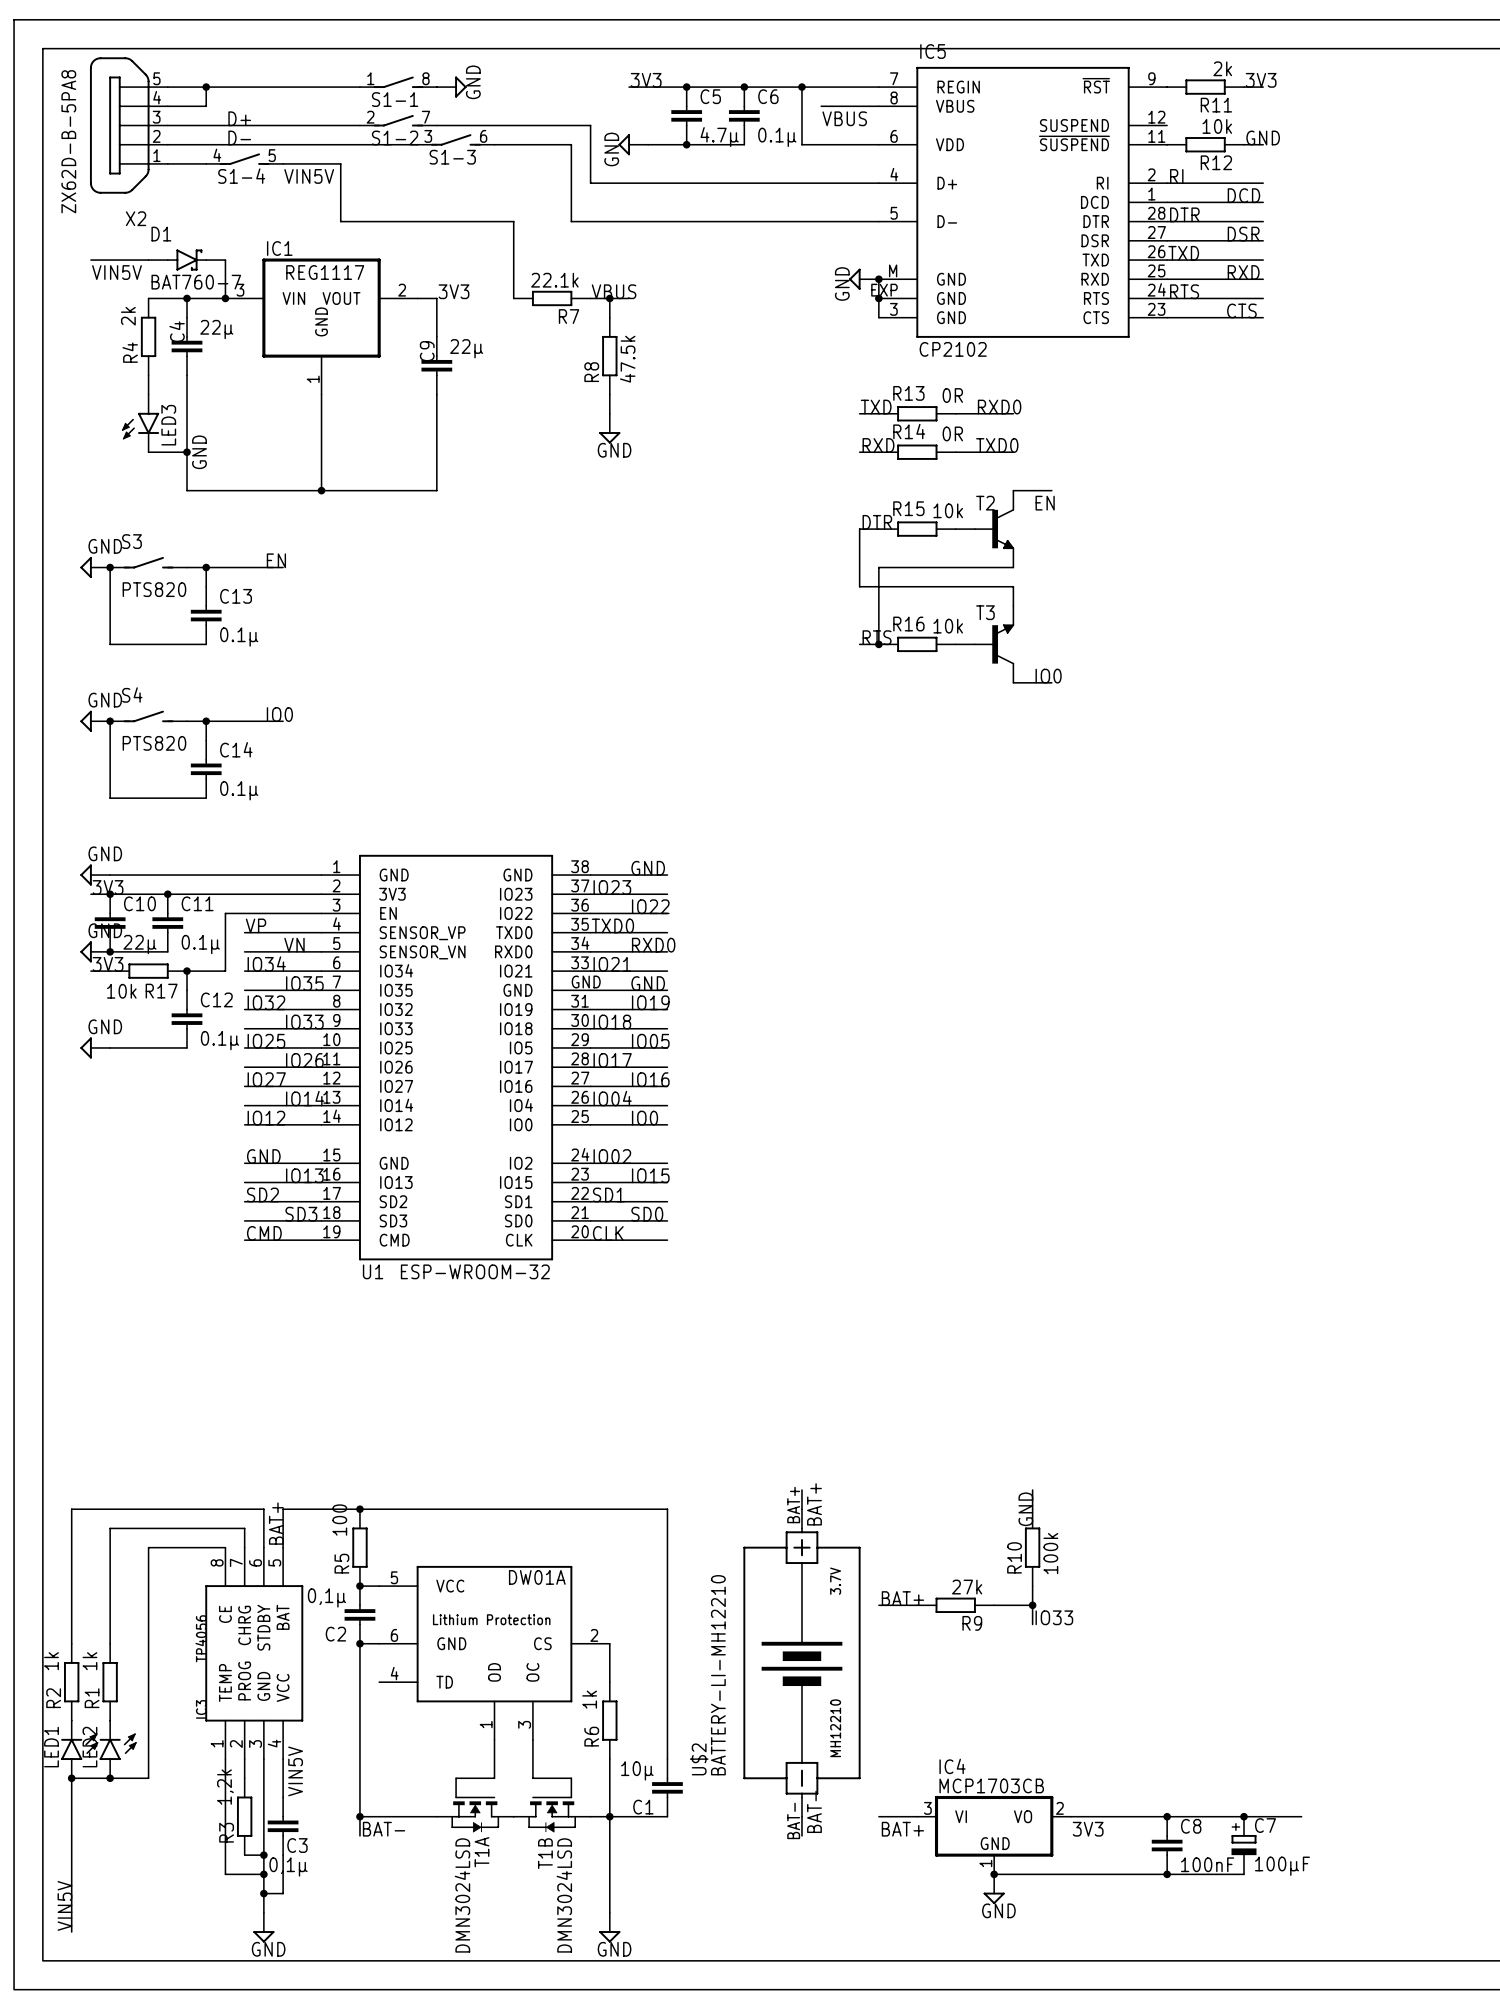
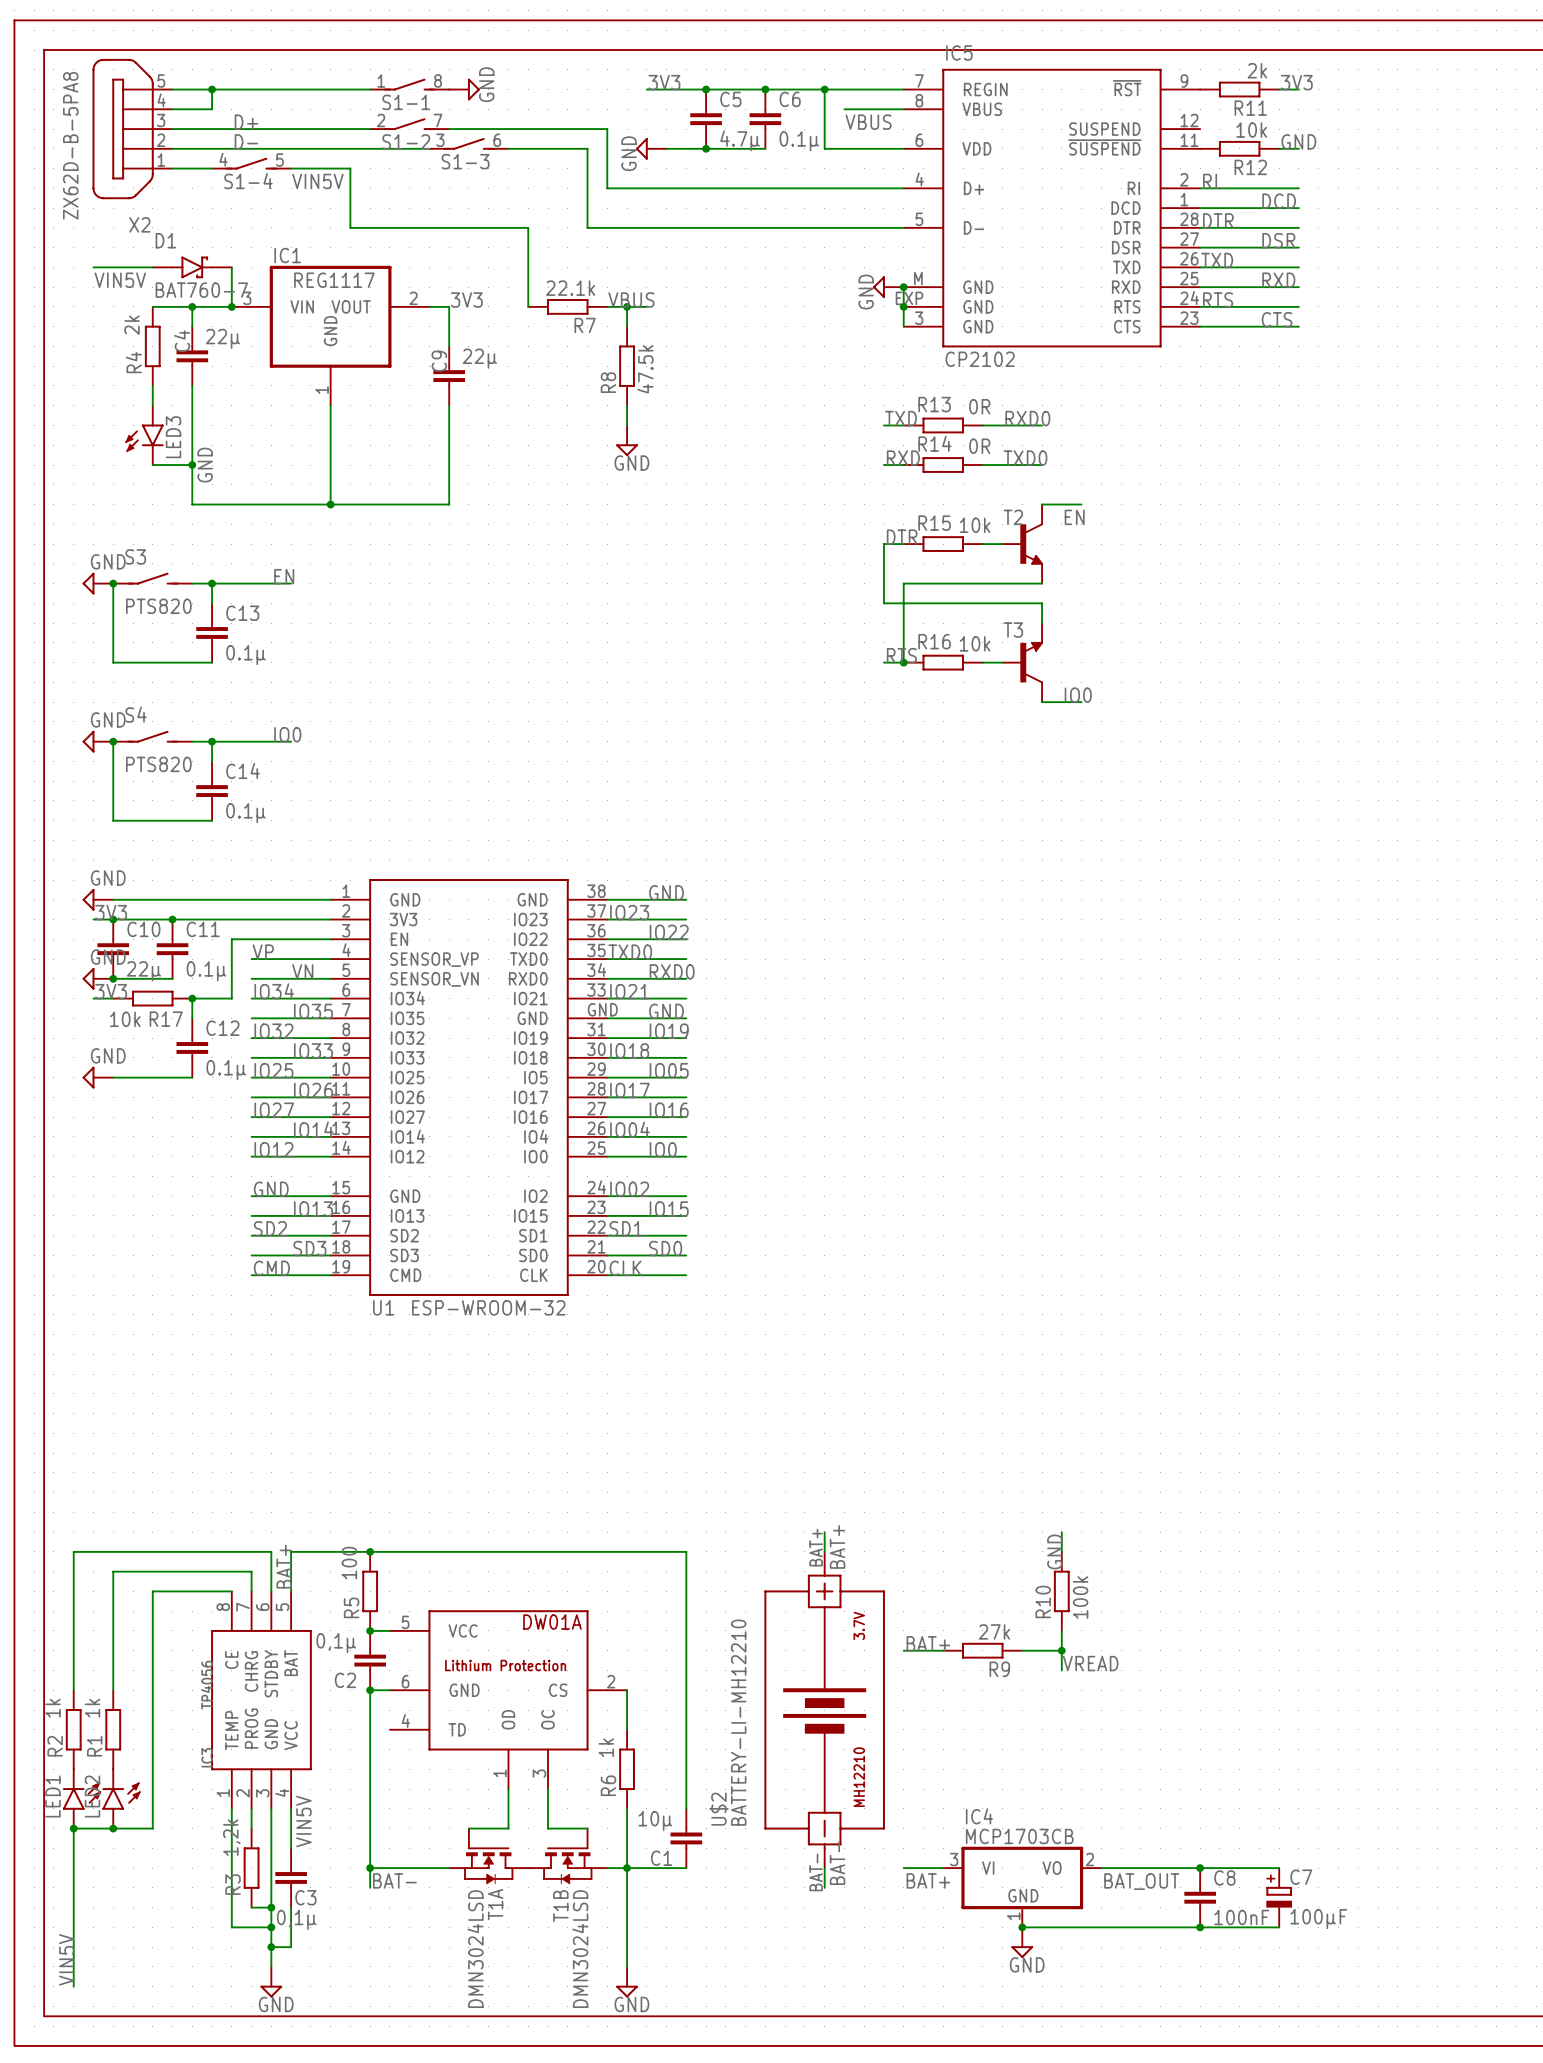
label: IO33 (1054, 1617) -> VREAD (1090, 1663)
wire: (1244, 1816) (1301, 1816) -> none
junction: (1244, 1816) -> none
label: 3V3 (1088, 1829) -> BAT_OUT (1141, 1881)

